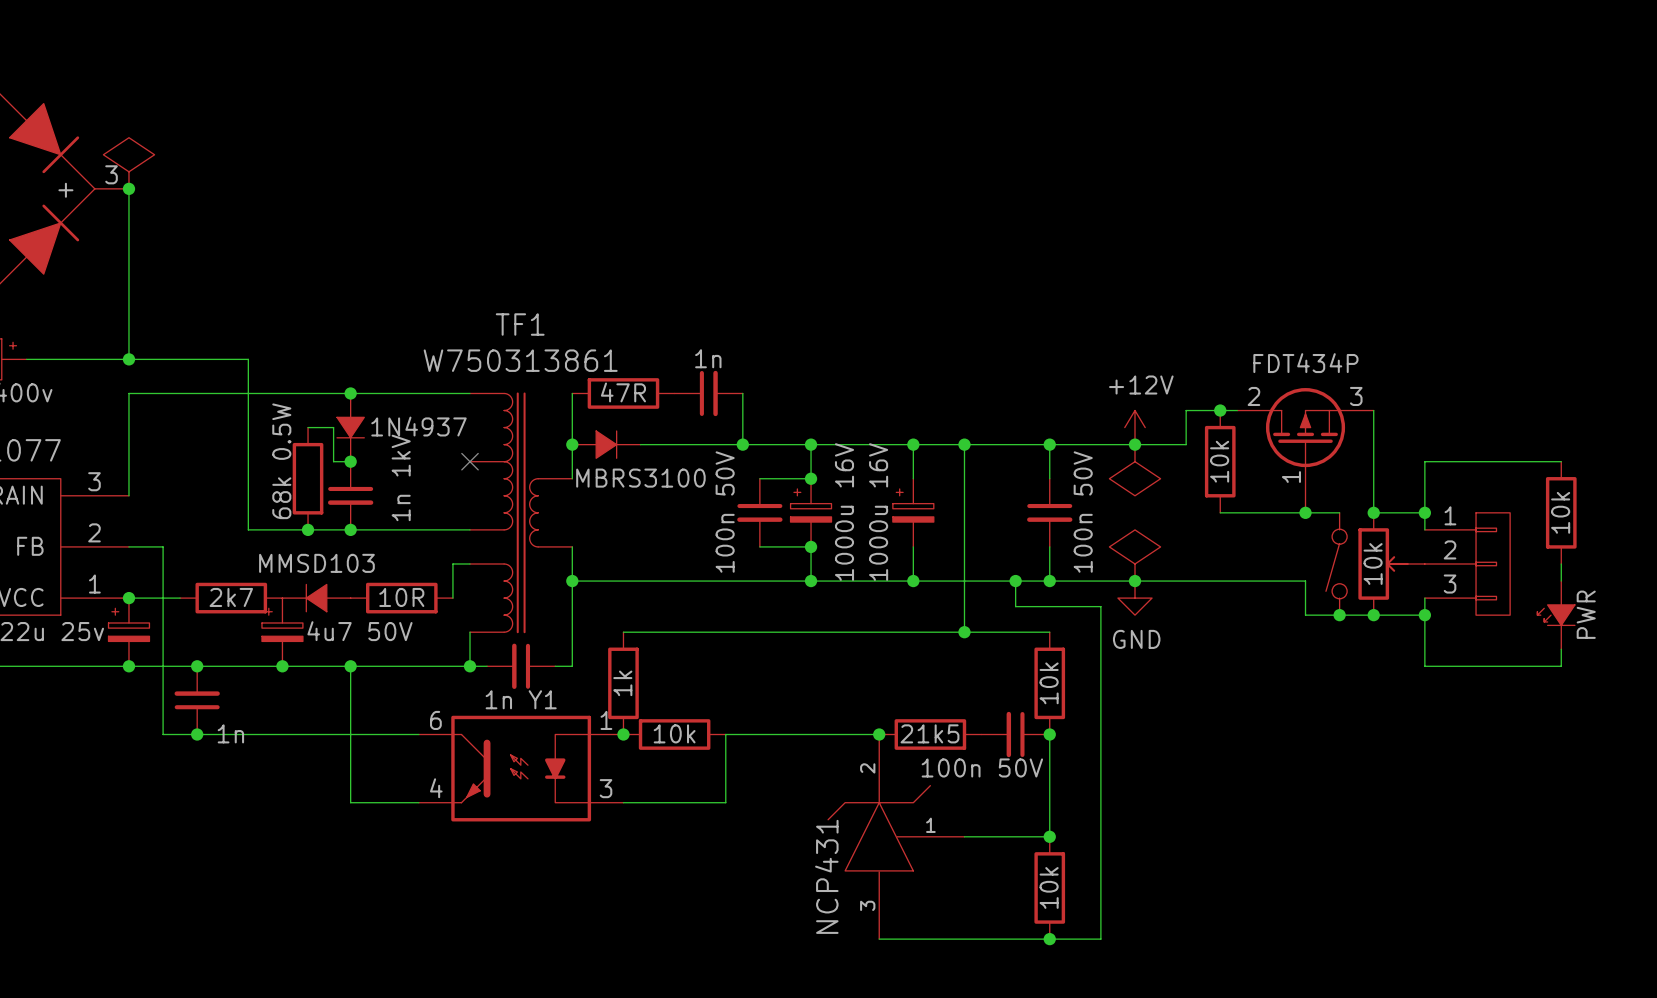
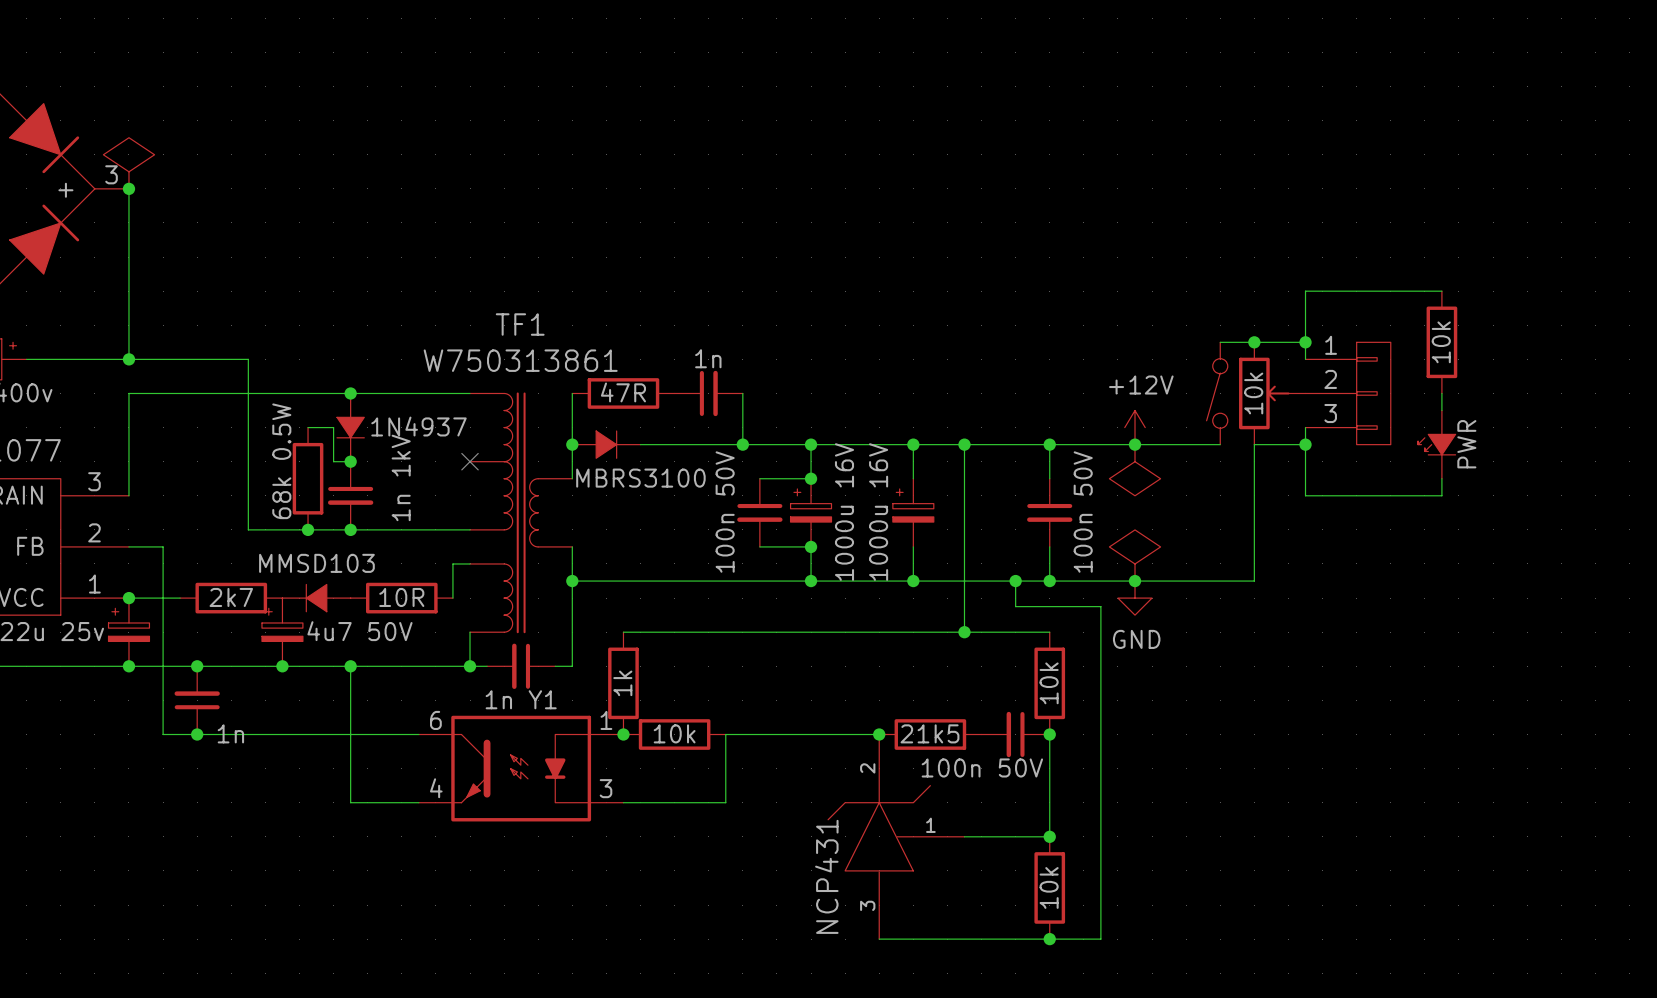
wire: none -> (1220, 342) (1305, 342)
junction: none -> (1254, 342)
junction: none -> (1305, 342)
part: none -> 10k (1441, 342)
junction: (1220, 410) -> none
wire: (1237, 410) (1186, 410) (1186, 444) -> (1220, 444) (1186, 444)
wire: (1373, 410) (1373, 512) (1424, 512) -> none
junction: none -> (1305, 444)
part: FDT434P (1305, 450) -> none
part: 10k (1220, 461) -> none
wire: (1561, 461) (1424, 461) (1424, 529) -> (1441, 291) (1305, 291) (1305, 359)
wire: (1220, 512) (1339, 512) -> none
junction: (1305, 512) -> none
junction: (1373, 512) -> none
junction: (1424, 512) -> none
part: 10k (1561, 512) -> none
part position: (1375, 563) -> (1256, 393)
part position: (1467, 563) -> (1348, 393)
wire: (1561, 563) (1561, 581) -> (1441, 393) (1441, 410)
wire: (1254, 581) (1305, 581) (1305, 615) (1424, 615) -> (1254, 581) (1254, 444) (1305, 444)
wire: (1424, 598) (1424, 666) (1561, 666) (1561, 649) -> (1305, 427) (1305, 495) (1441, 495) (1441, 478)
junction: (1339, 615) -> none
junction: (1373, 615) -> none
junction: (1424, 615) -> none
part position: (1556, 615) -> (1436, 444)

